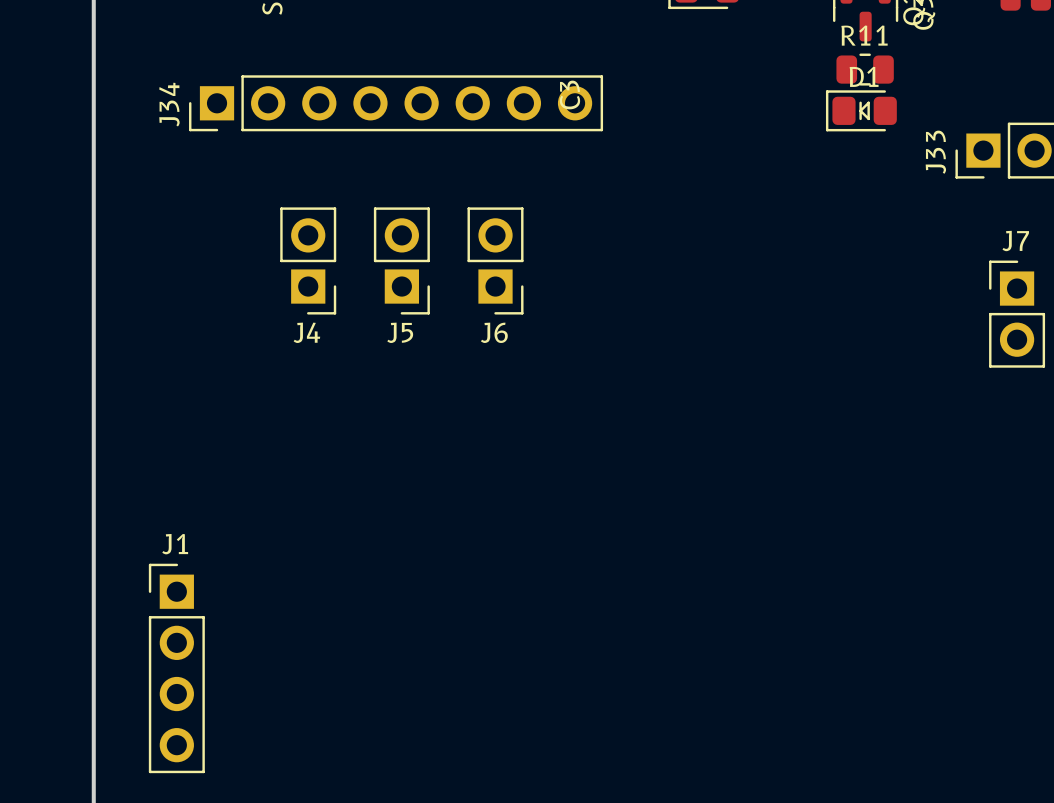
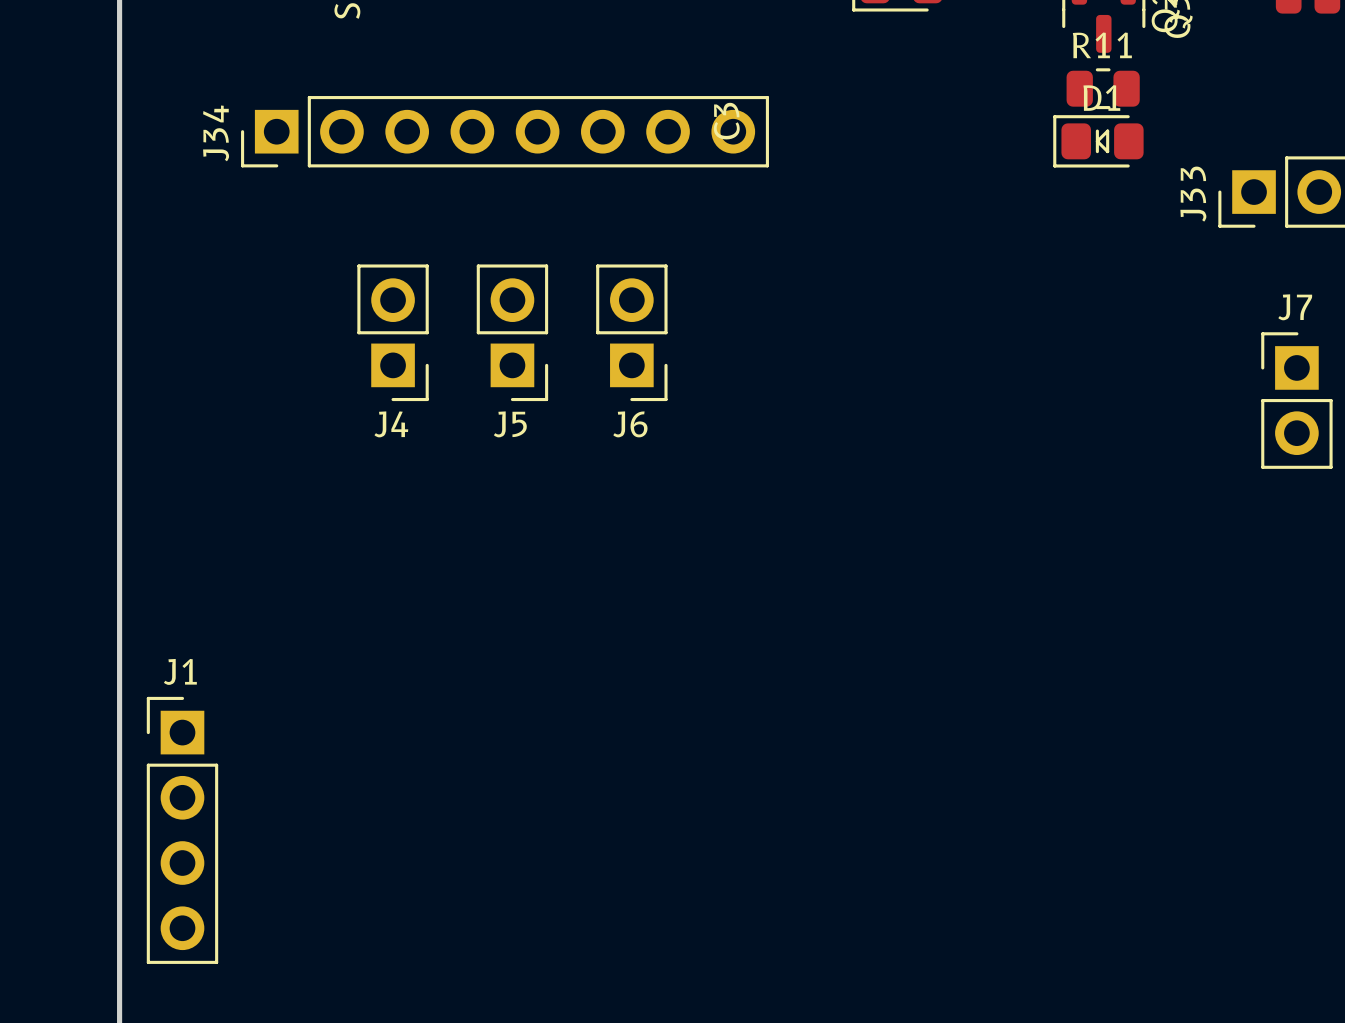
J1 position: (176, 668) -> (182, 830)

